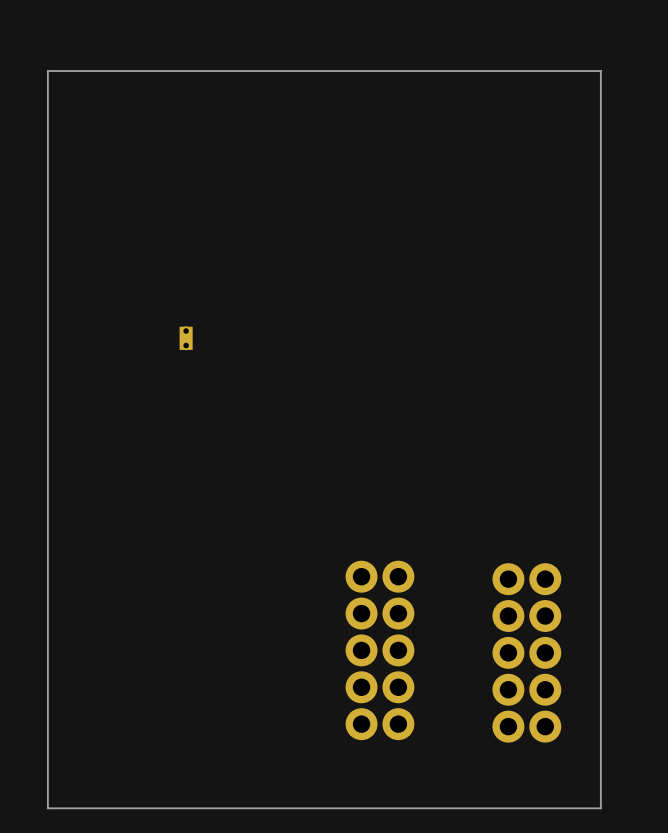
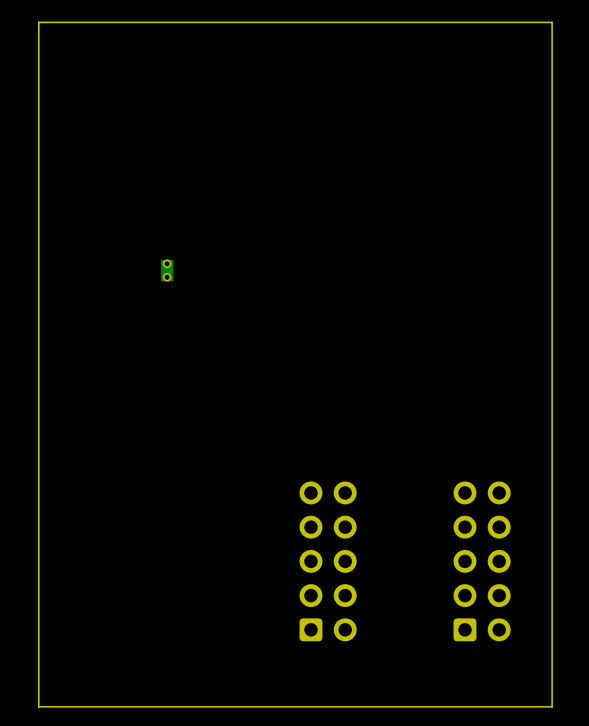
part footprint: [492, 563, 562, 743] -> [453, 481, 511, 642]
part: (379, 650) -> none
part: none -> (328, 561)

